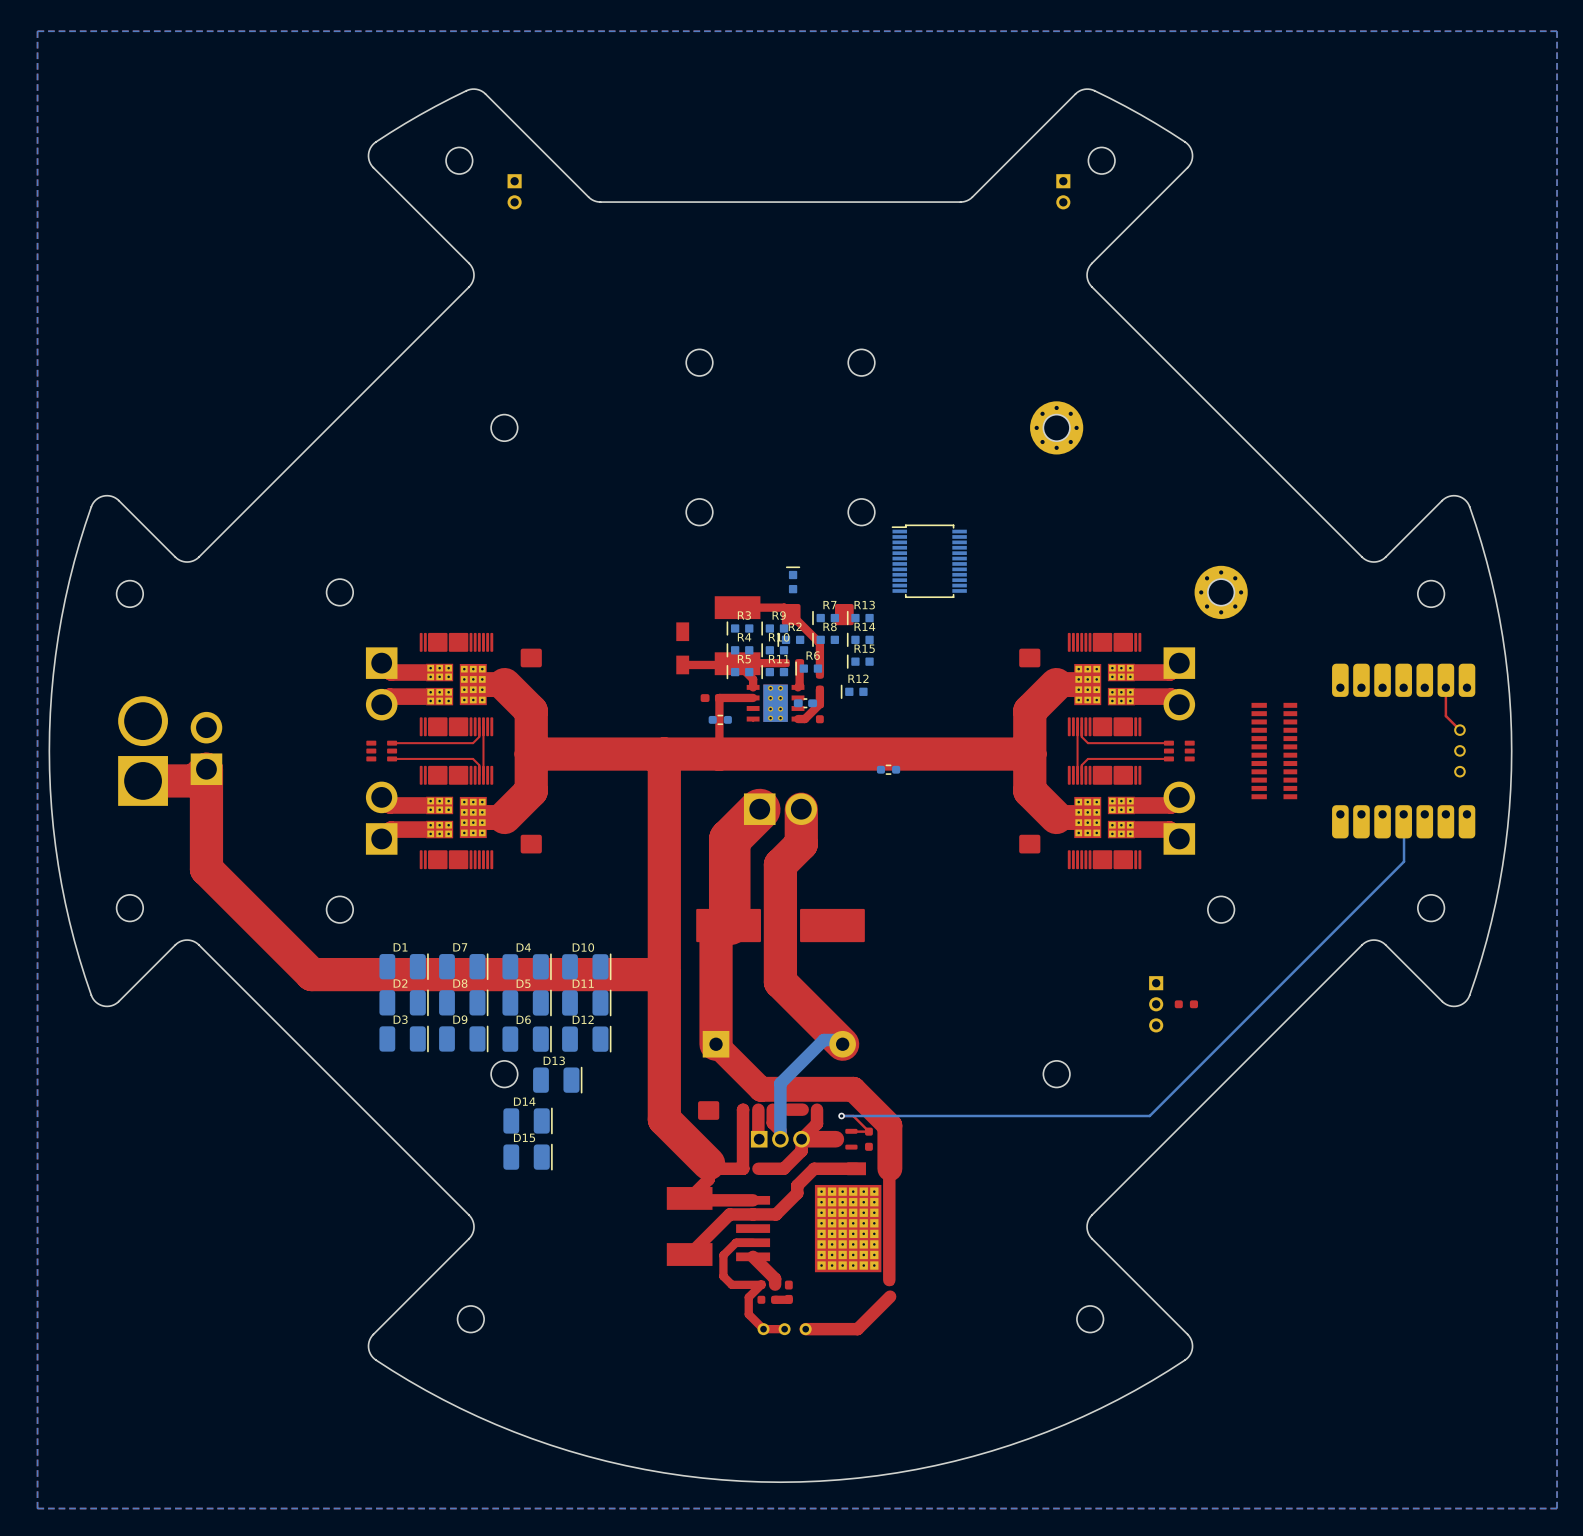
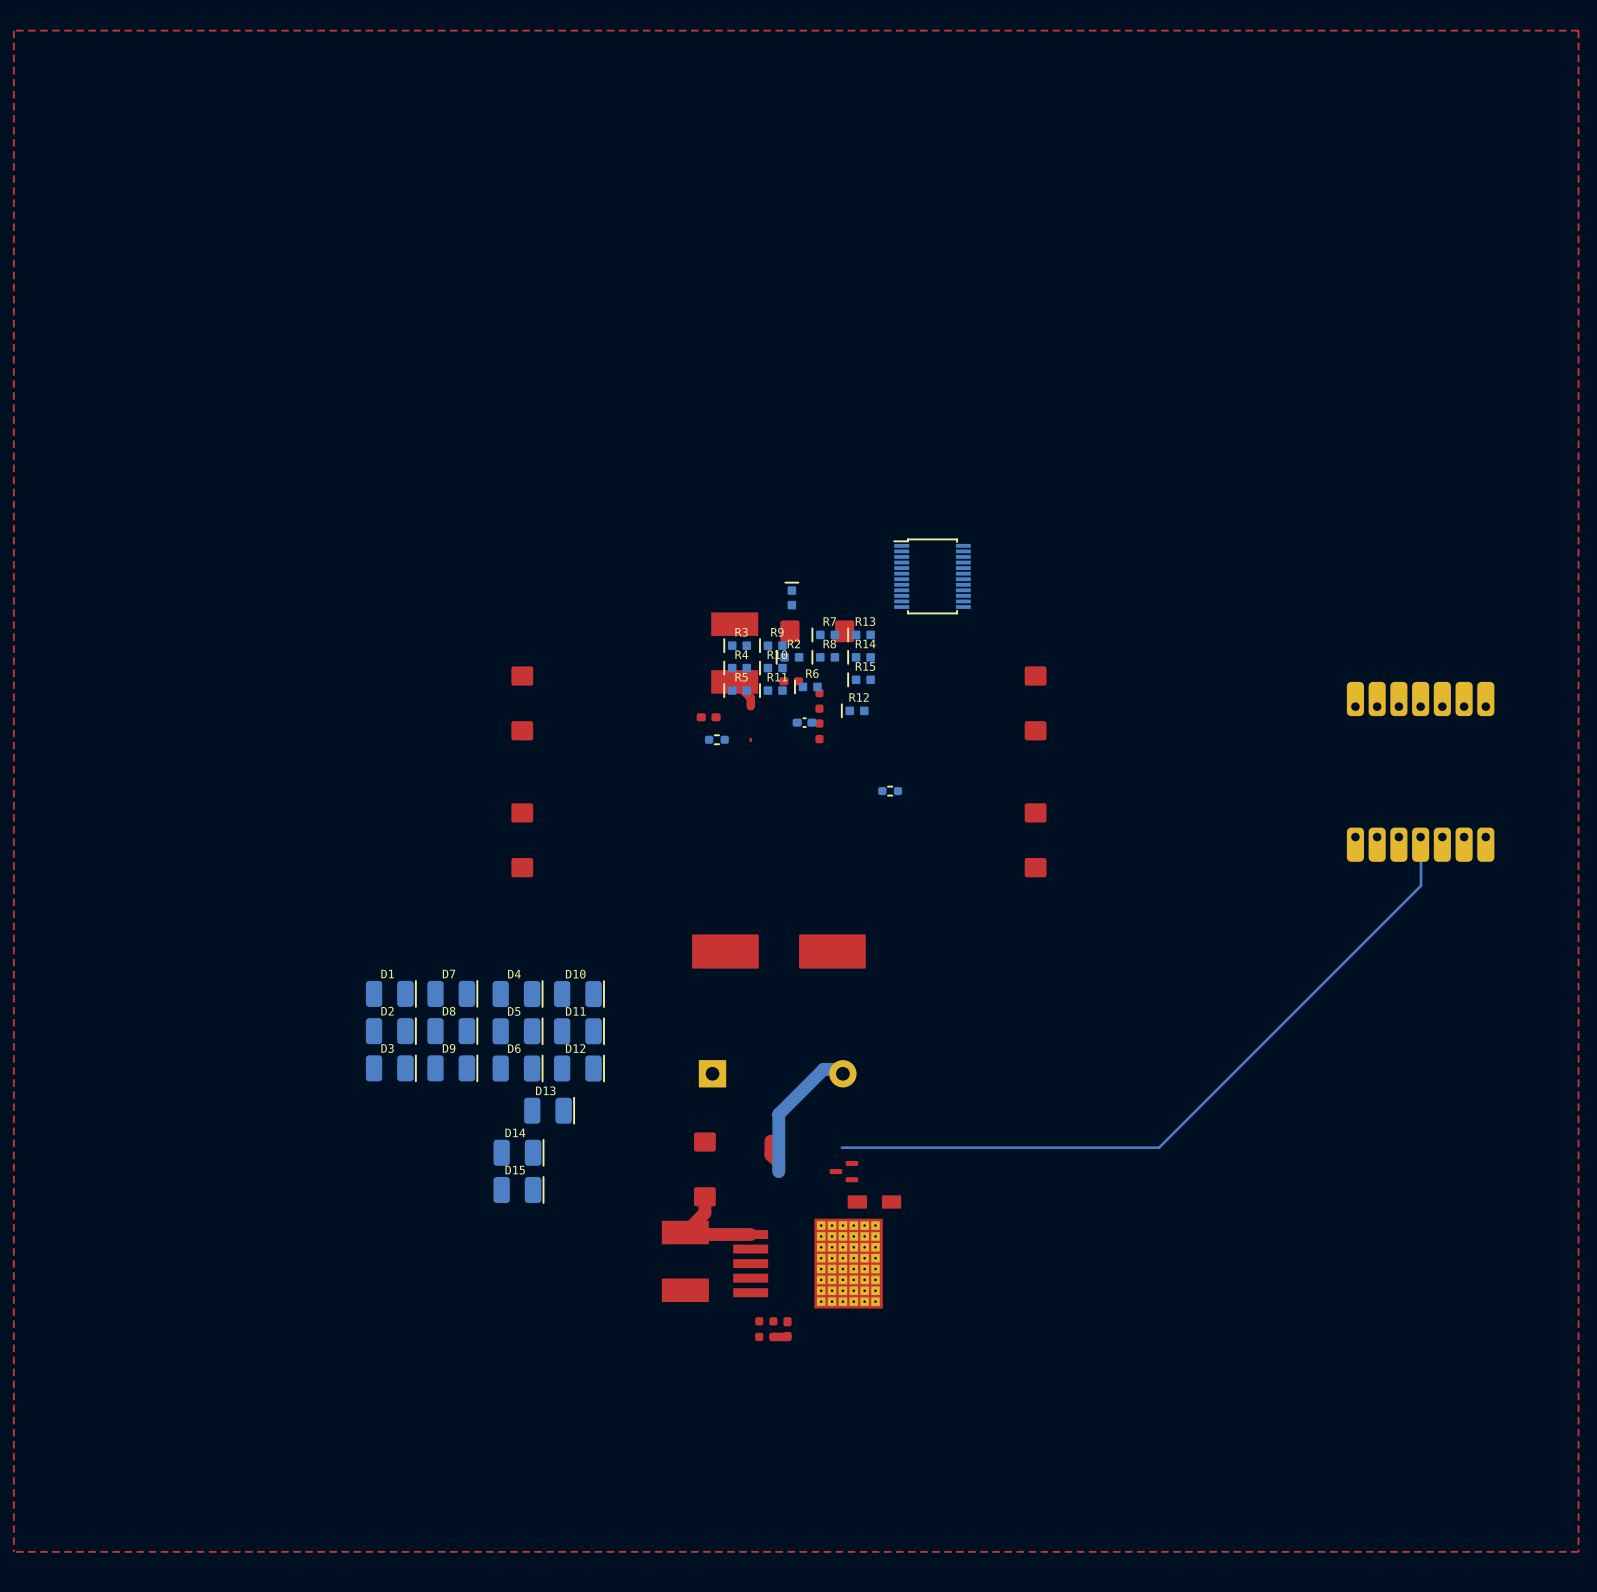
bottom zone outline: (1557, 31) (1557, 1508) (37, 1508) (37, 31) (1557, 31) -> none
board edge: (1094, 90) (1140, 114) (1185, 142) (1190, 148) (1192, 156) (1187, 167) (1090, 265) (1087, 275) (1091, 286) (1365, 559) (1373, 562) (1384, 558) (1447, 497) (1459, 496) (1465, 499) (1469, 506) (1486, 561) (1499, 617) (1509, 693) (1511, 751) (1509, 808) (1499, 884) (1486, 940) (1468, 997) (1465, 1002) (1457, 1005) (1445, 1004) (1384, 943) (1373, 940) (1365, 942) (1091, 1215) (1087, 1224) (1090, 1237) (1187, 1334) (1191, 1341) (1192, 1347) (1186, 1358) (1152, 1380) (1100, 1408) (1065, 1424) (991, 1451) (916, 1469) (838, 1479) (761, 1481) (683, 1475) (606, 1461) (532, 1438) (460, 1408) (408, 1380) (375, 1360) (370, 1353) (368, 1345) (373, 1334) (470, 1237) (474, 1226) (470, 1216) (195, 942) (187, 940) (176, 943) (113, 1005) (101, 1005) (95, 1002) (91, 995) (69, 921) (58, 865) (51, 808) (49, 751) (53, 674) (61, 617) (74, 561) (92, 504) (101, 496) (109, 495) (115, 498) (176, 558) (187, 562) (195, 559) (469, 286) (473, 277) (470, 264) (373, 167) (368, 156) (370, 148) (375, 142) (420, 114) (466, 90) (474, 89) (483, 92) (588, 197) (600, 202) (964, 201) (972, 197) (1077, 92) (1086, 89) (1094, 90) -> none
round board edge: [445, 146, 474, 175] -> none
round board edge: [1087, 146, 1116, 175] -> none
part: (514, 191) -> none
part: (1063, 191) -> none
round board edge: [685, 348, 714, 377] -> none
round board edge: [847, 348, 876, 377] -> none
round board edge: [490, 413, 519, 443] -> none
round board edge: [1042, 413, 1071, 443] -> none
part: (1056, 427) -> none
round board edge: [685, 498, 714, 527] -> none
round board edge: [847, 498, 876, 527] -> none
round board edge: [325, 578, 355, 607] -> none
round board edge: [1207, 578, 1236, 607] -> none
round board edge: [115, 579, 145, 609] -> none
round board edge: [1417, 579, 1446, 609] -> none
part: (1221, 592) -> none
top track: (737, 607) (784, 607) (819, 643) (819, 674) -> none
part: (682, 648) -> none
top track: (381, 663) (391, 672) (439, 672) -> none
top track: (785, 663) (682, 664) -> none
top track: (799, 663) (799, 685) (798, 687) -> none
top track: (1179, 663) (1169, 672) (1121, 672) -> none
part: (381, 683) -> none
part: (1179, 683) -> none
part: (456, 684) -> none
top track: (473, 684) (504, 684) (531, 711) (531, 790) (504, 817) (473, 817) -> none
top track: (1087, 684) (1056, 684) (1029, 711) (1029, 790) (1056, 817) (1087, 817) -> none
part: (1104, 684) -> none
top track: (1445, 687) (1445, 716) (1459, 730) -> none
top track: (819, 689) (819, 704) (804, 719) (798, 719) -> none
top track: (439, 696) (389, 696) (381, 704) -> none
top track: (1121, 696) (1171, 696) (1179, 704) -> none
top track: (753, 697) (719, 698) (719, 754) -> none
part: (775, 703) -> none
top track: (479, 726) (479, 736) (473, 743) (392, 743) -> none
top track: (483, 726) (483, 775) -> none
top track: (1077, 726) (1077, 775) -> none
top track: (1081, 726) (1081, 736) (1087, 743) (1168, 743) -> none
part: (206, 748) -> none
part: (1459, 750) -> none
part: (143, 751) -> none
part: (381, 751) -> none
part: (1179, 751) -> none
part: (1274, 751) -> none
top track: (664, 754) (664, 1119) (713, 1168) (743, 1168) (743, 1109) -> none
top track: (1029, 754) (531, 754) -> none
top track: (392, 758) (473, 758) (479, 765) (479, 775) -> none
top track: (1168, 758) (1087, 758) (1081, 765) (1081, 775) -> none
top track: (143, 780) (194, 780) (206, 769) (206, 869) (311, 974) (664, 974) -> none
top track: (381, 797) (389, 805) (439, 805) -> none
top track: (1179, 797) (1171, 805) (1121, 805) -> none
top track: (759, 809) (729, 839) (729, 924) -> none
part: (780, 809) -> none
top track: (801, 809) (801, 843) (780, 864) (780, 981) (842, 1044) -> none
part: (456, 817) -> none
part: (1104, 817) -> none
part: (381, 818) -> none
part: (1179, 818) -> none
top track: (439, 829) (391, 829) (381, 838) -> none
top track: (1121, 829) (1169, 829) (1179, 838) -> none
round board edge: [115, 894, 145, 923] -> none
round board edge: [1417, 894, 1446, 923] -> none
round board edge: [325, 895, 355, 924] -> none
round board edge: [1207, 895, 1236, 924] -> none
top track: (728, 925) (716, 938) (716, 1044) (761, 1089) (853, 1089) (889, 1125) (889, 1280) -> none
part: (1156, 1004) -> none
part: (1186, 1004) -> none
round board edge: [490, 1060, 519, 1089] -> none
round board edge: [1042, 1060, 1071, 1089] -> none
top track: (758, 1109) (759, 1139) -> none
top track: (802, 1109) (787, 1109) -> none
top track: (817, 1109) (817, 1123) (801, 1139) -> none
top track: (841, 1116) (853, 1116) (868, 1131) (851, 1131) -> none
via: (841, 1116) -> none
part: (780, 1139) -> none
top track: (801, 1139) (801, 1150) (783, 1168) (758, 1168) -> none
top track: (835, 1139) (801, 1139) -> none
part: (868, 1139) -> none
top track: (856, 1168) (814, 1168) (797, 1185) (797, 1193) (776, 1214) (729, 1214) (689, 1254) -> none
top track: (753, 1242) (735, 1242) (723, 1255) (723, 1276) (731, 1284) (761, 1284) -> none
top track: (753, 1256) (775, 1278) (775, 1284) -> none
top track: (761, 1284) (748, 1297) (748, 1314) (763, 1329) (784, 1329) -> none
top track: (890, 1296) (857, 1329) (805, 1329) -> none
round board edge: [456, 1305, 485, 1334] -> none
round board edge: [1076, 1305, 1105, 1334] -> none
part: (784, 1329) -> none

